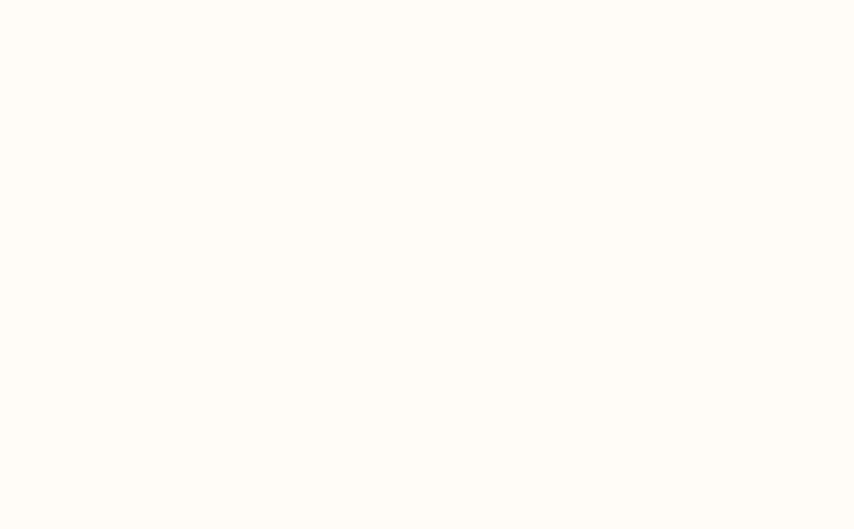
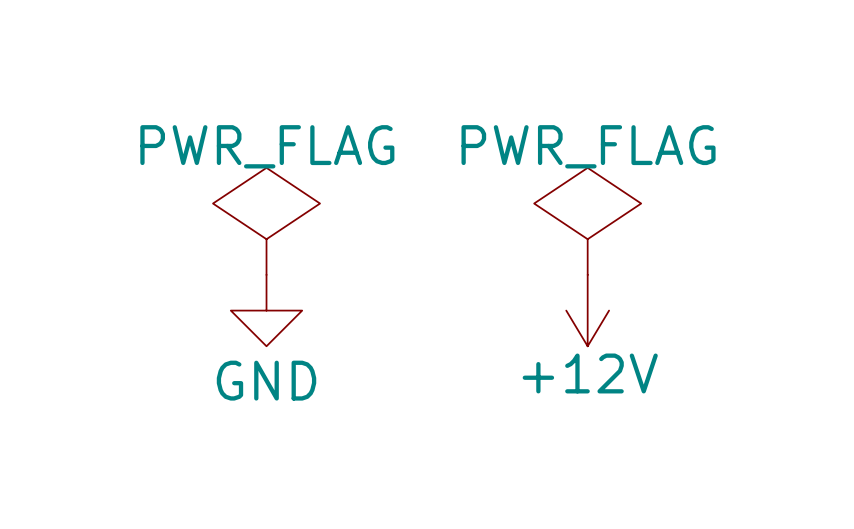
power symbol: none -> PWR_FLAG (266, 221)
power symbol: none -> PWR_FLAG (587, 221)
power symbol: none -> GND (266, 310)
power symbol: none -> +12V (587, 310)

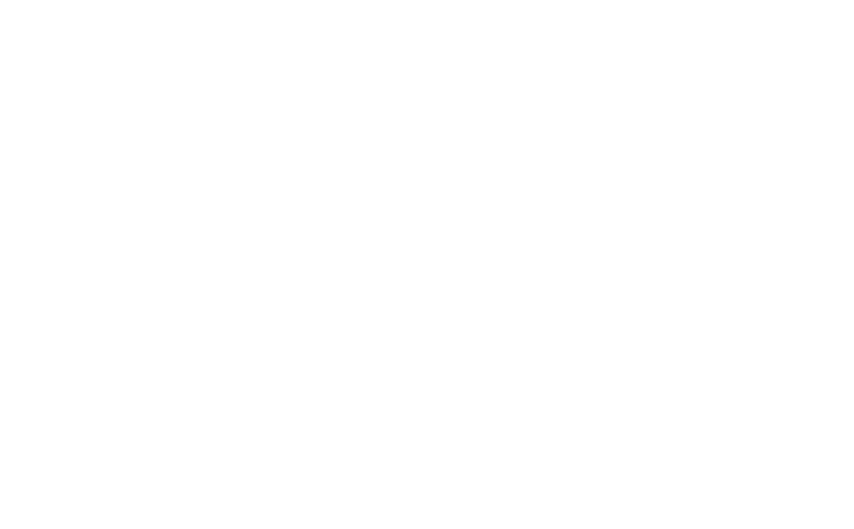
power symbol: PWR_FLAG (266, 221) -> none
power symbol: PWR_FLAG (587, 221) -> none
power symbol: GND (266, 310) -> none
power symbol: +12V (587, 310) -> none

